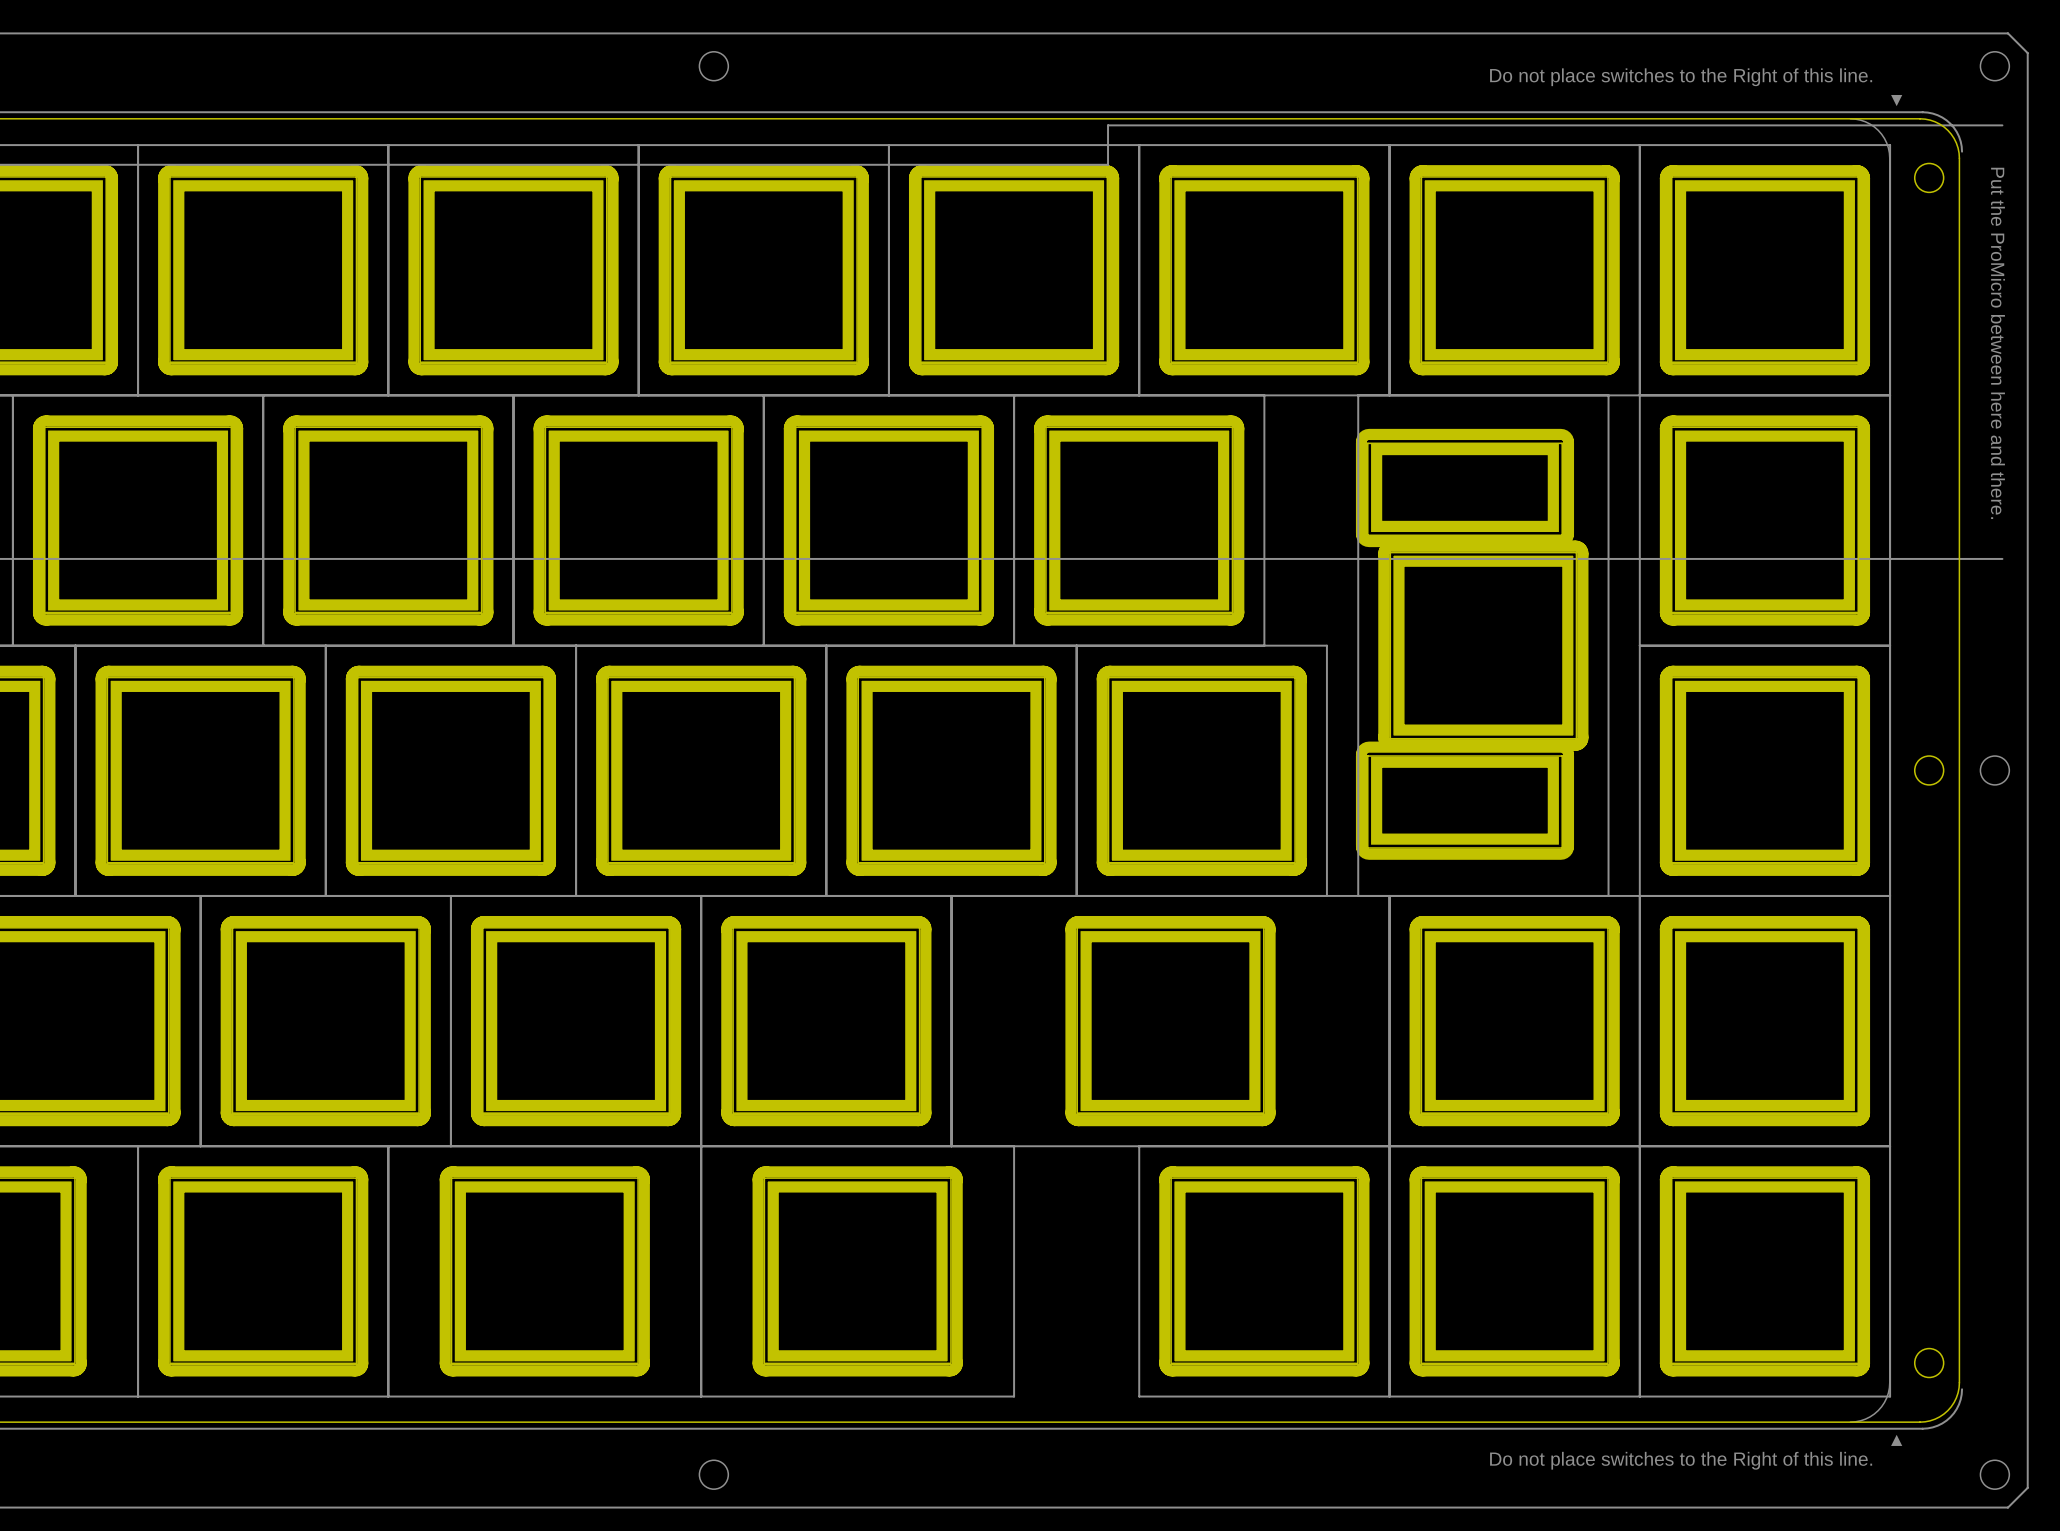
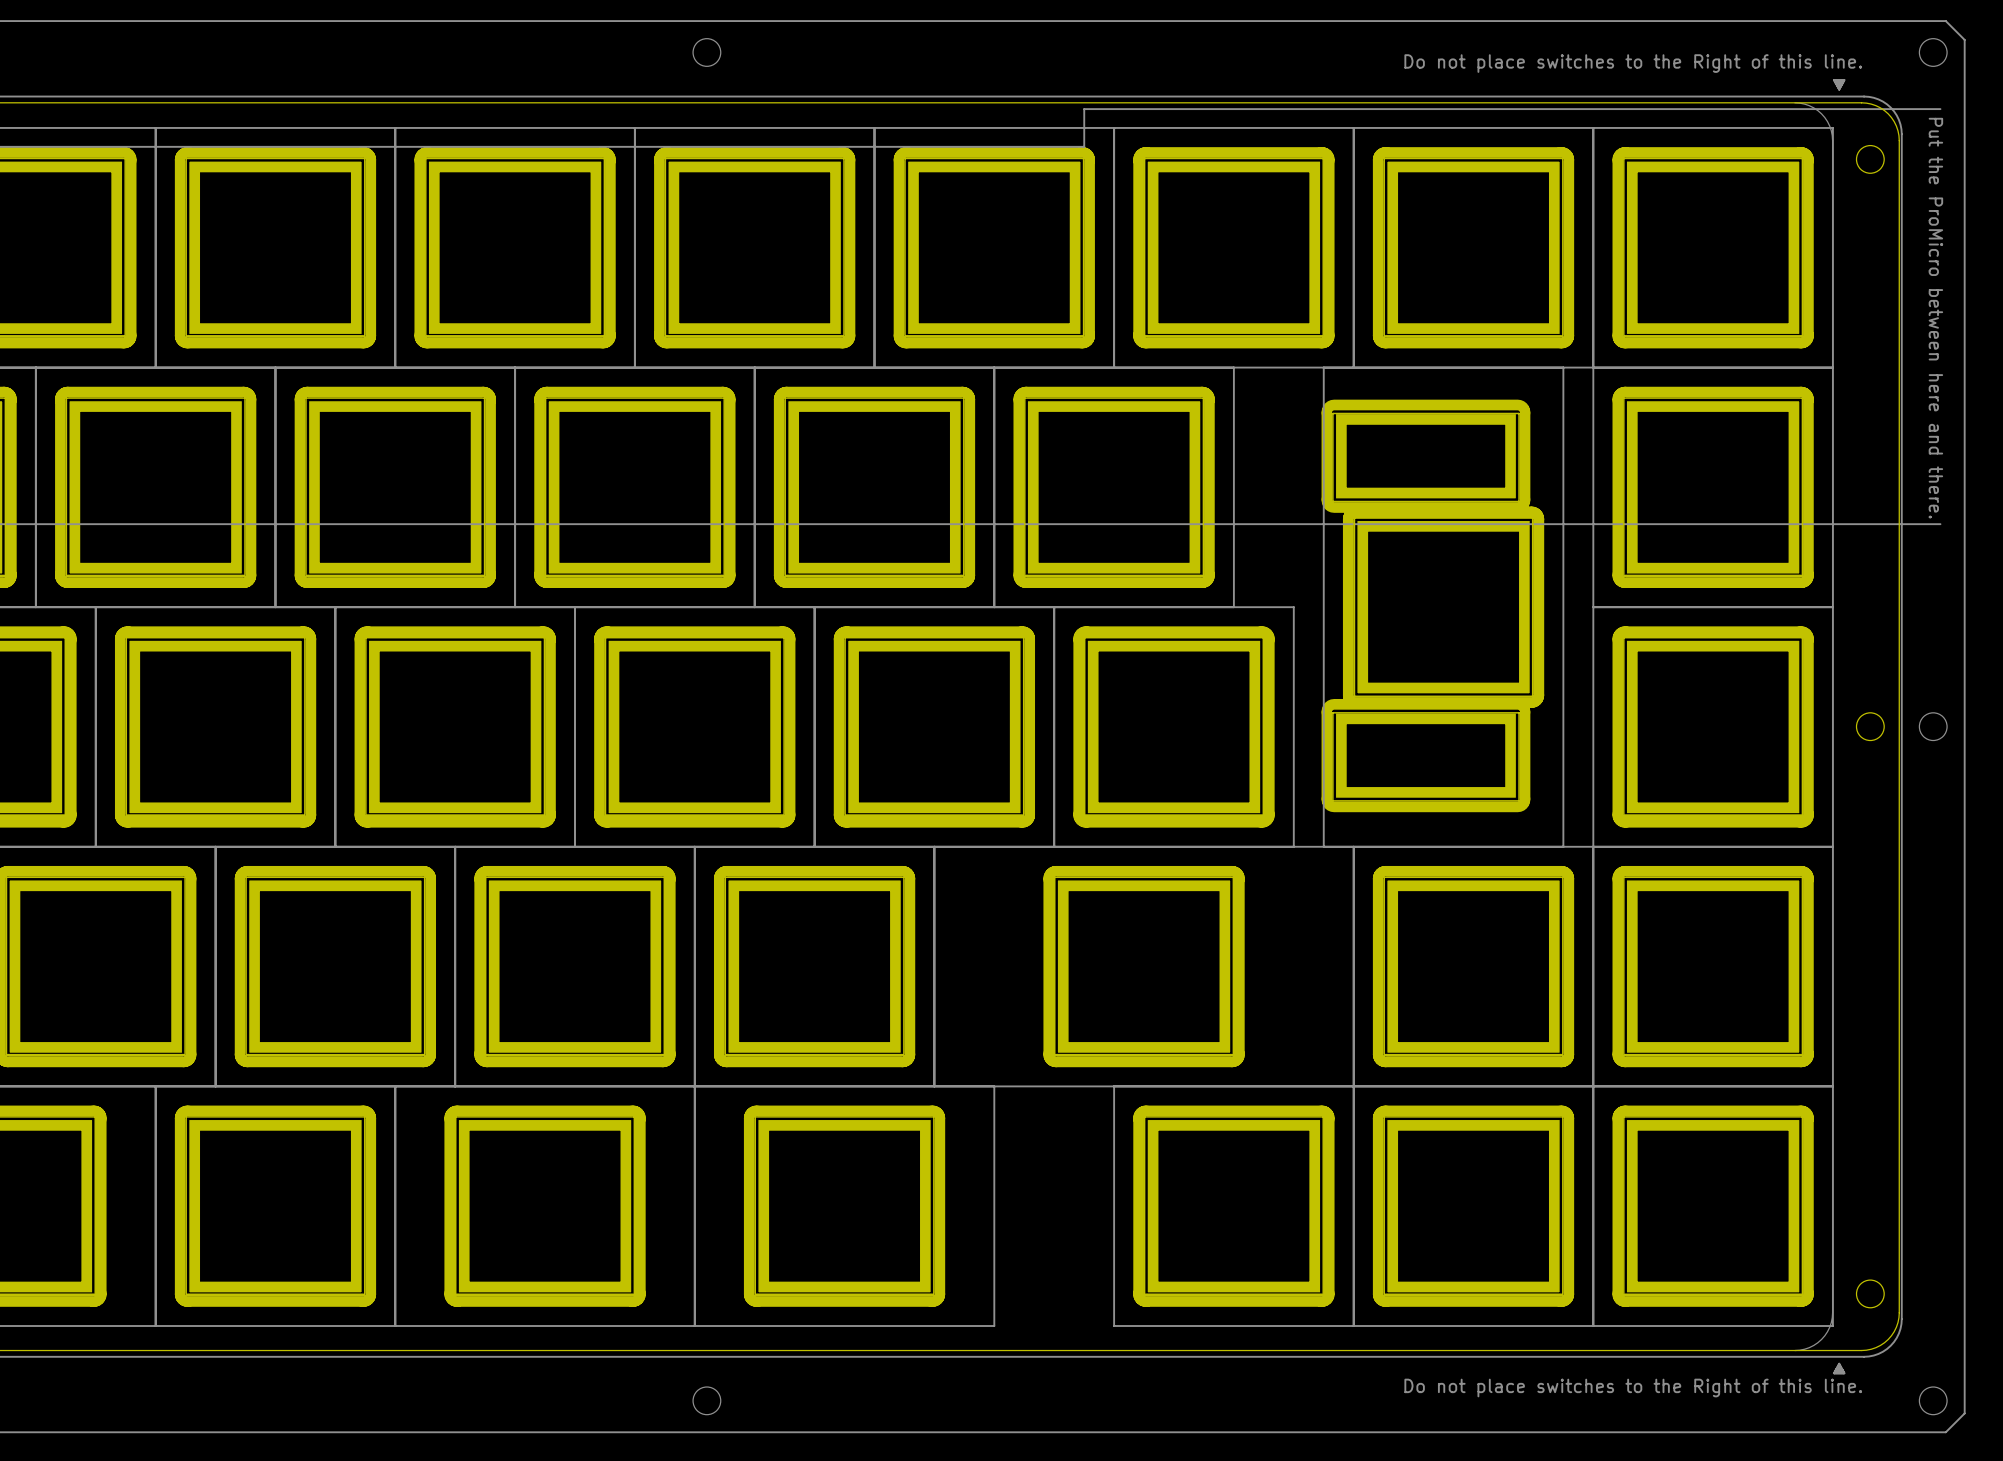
line: none -> (1901, 134) (1901, 1319)

